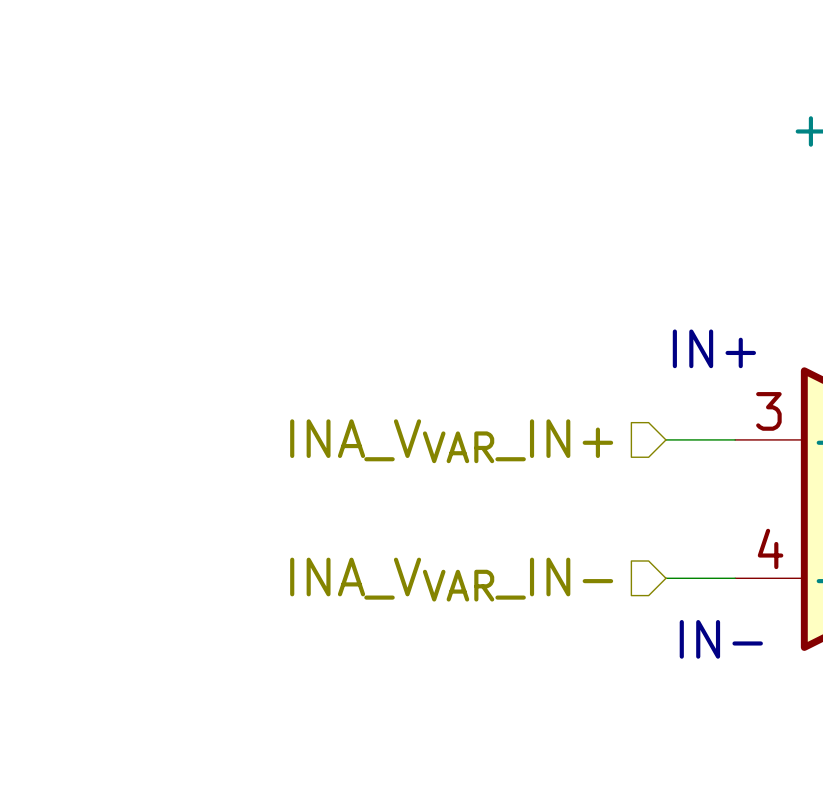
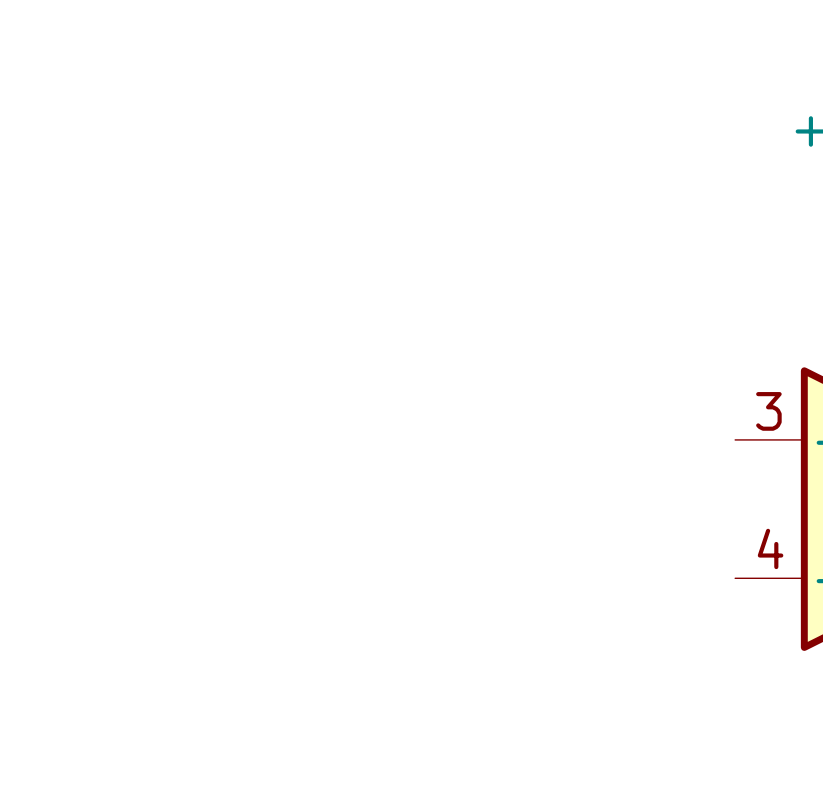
text: IN+ (714, 348) -> none
wire: (665, 439) (735, 439) -> none
hierarchical label: INA_VVAR_IN+ (451, 441) -> none
wire: (665, 578) (735, 578) -> none
hierarchical label: INA_VVAR_IN- (451, 579) -> none
text: IN- (721, 639) -> none

